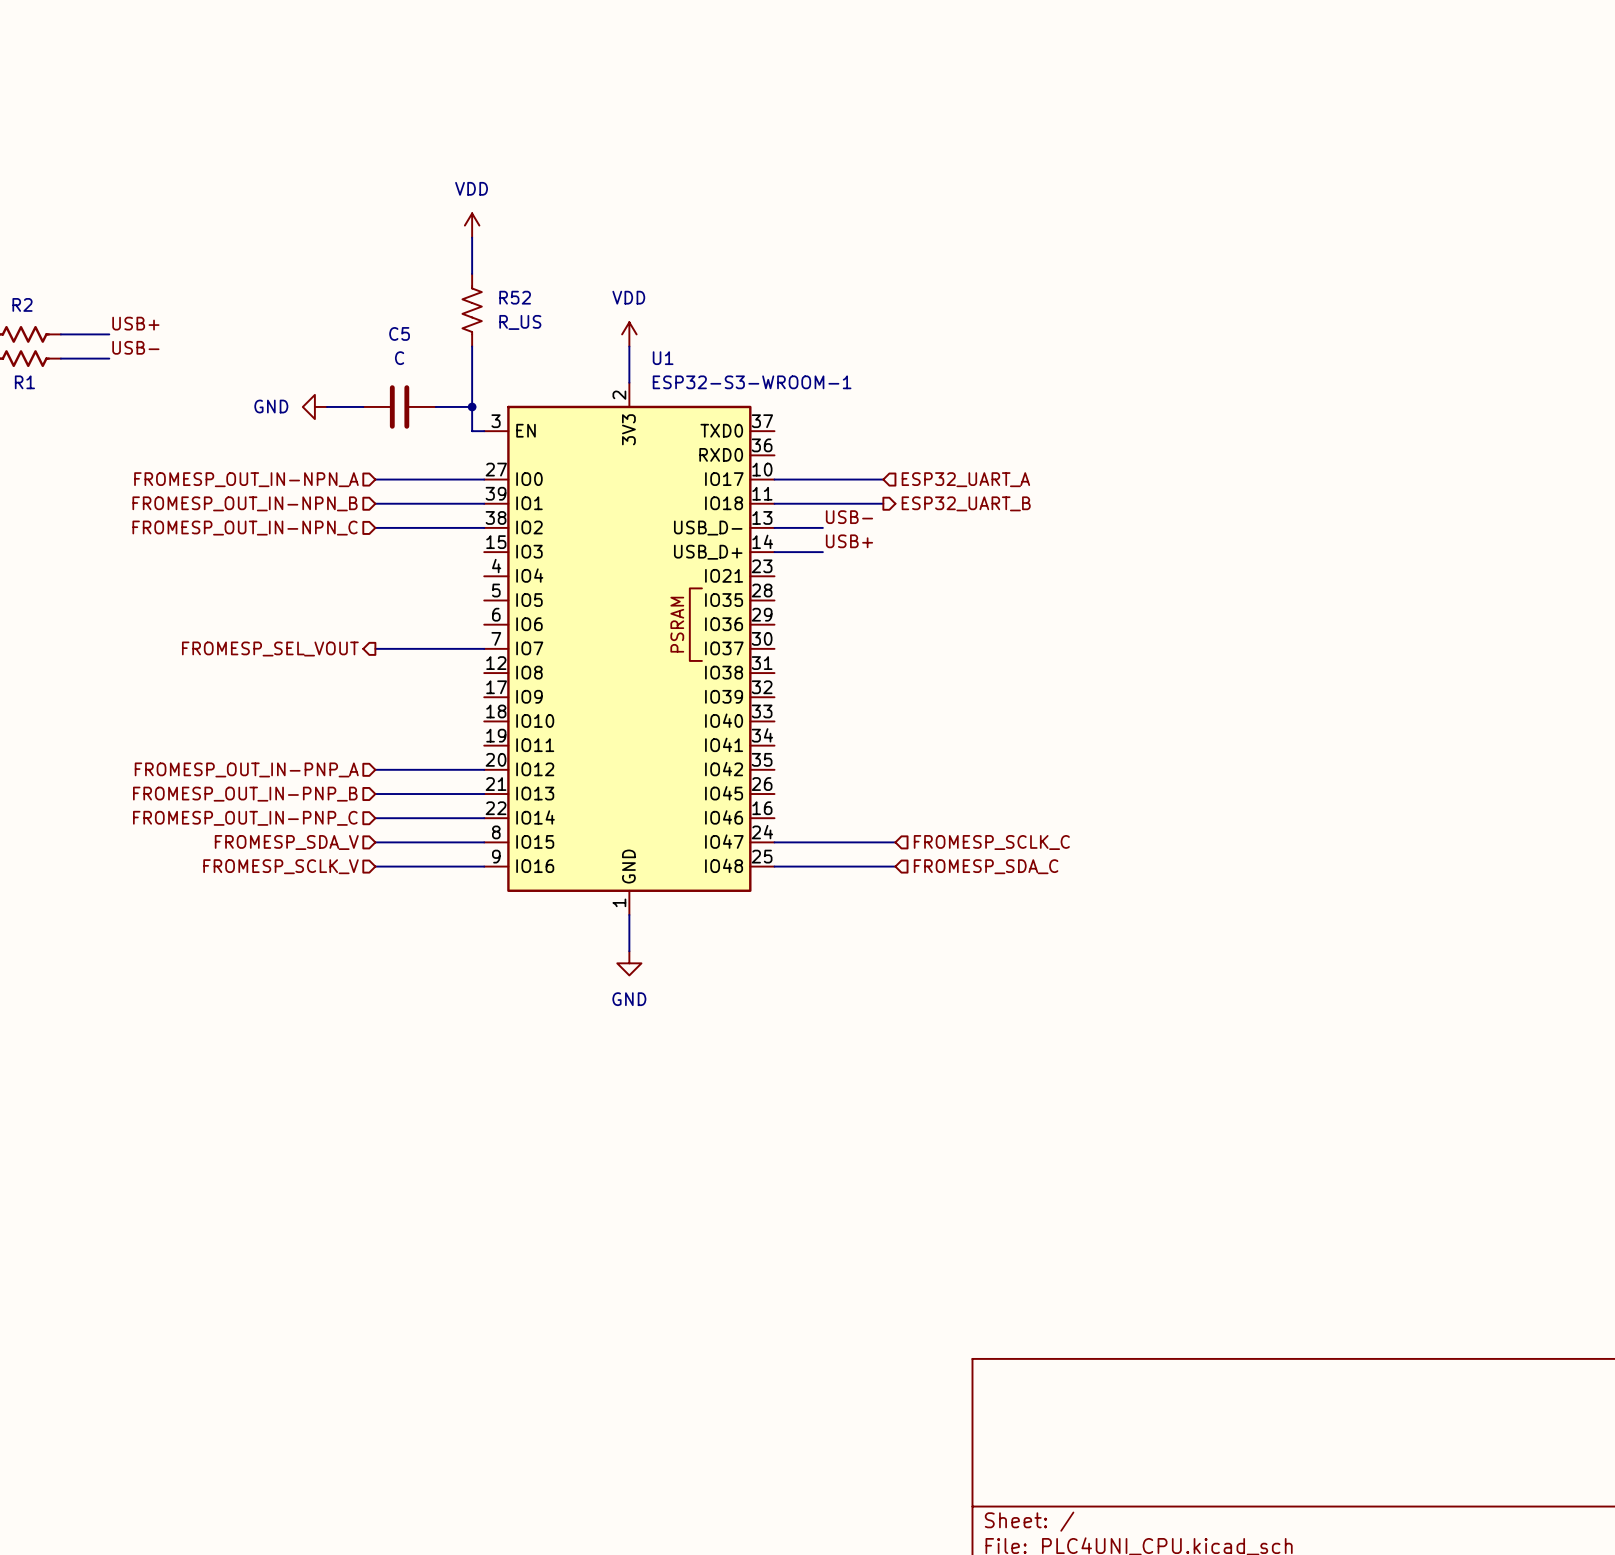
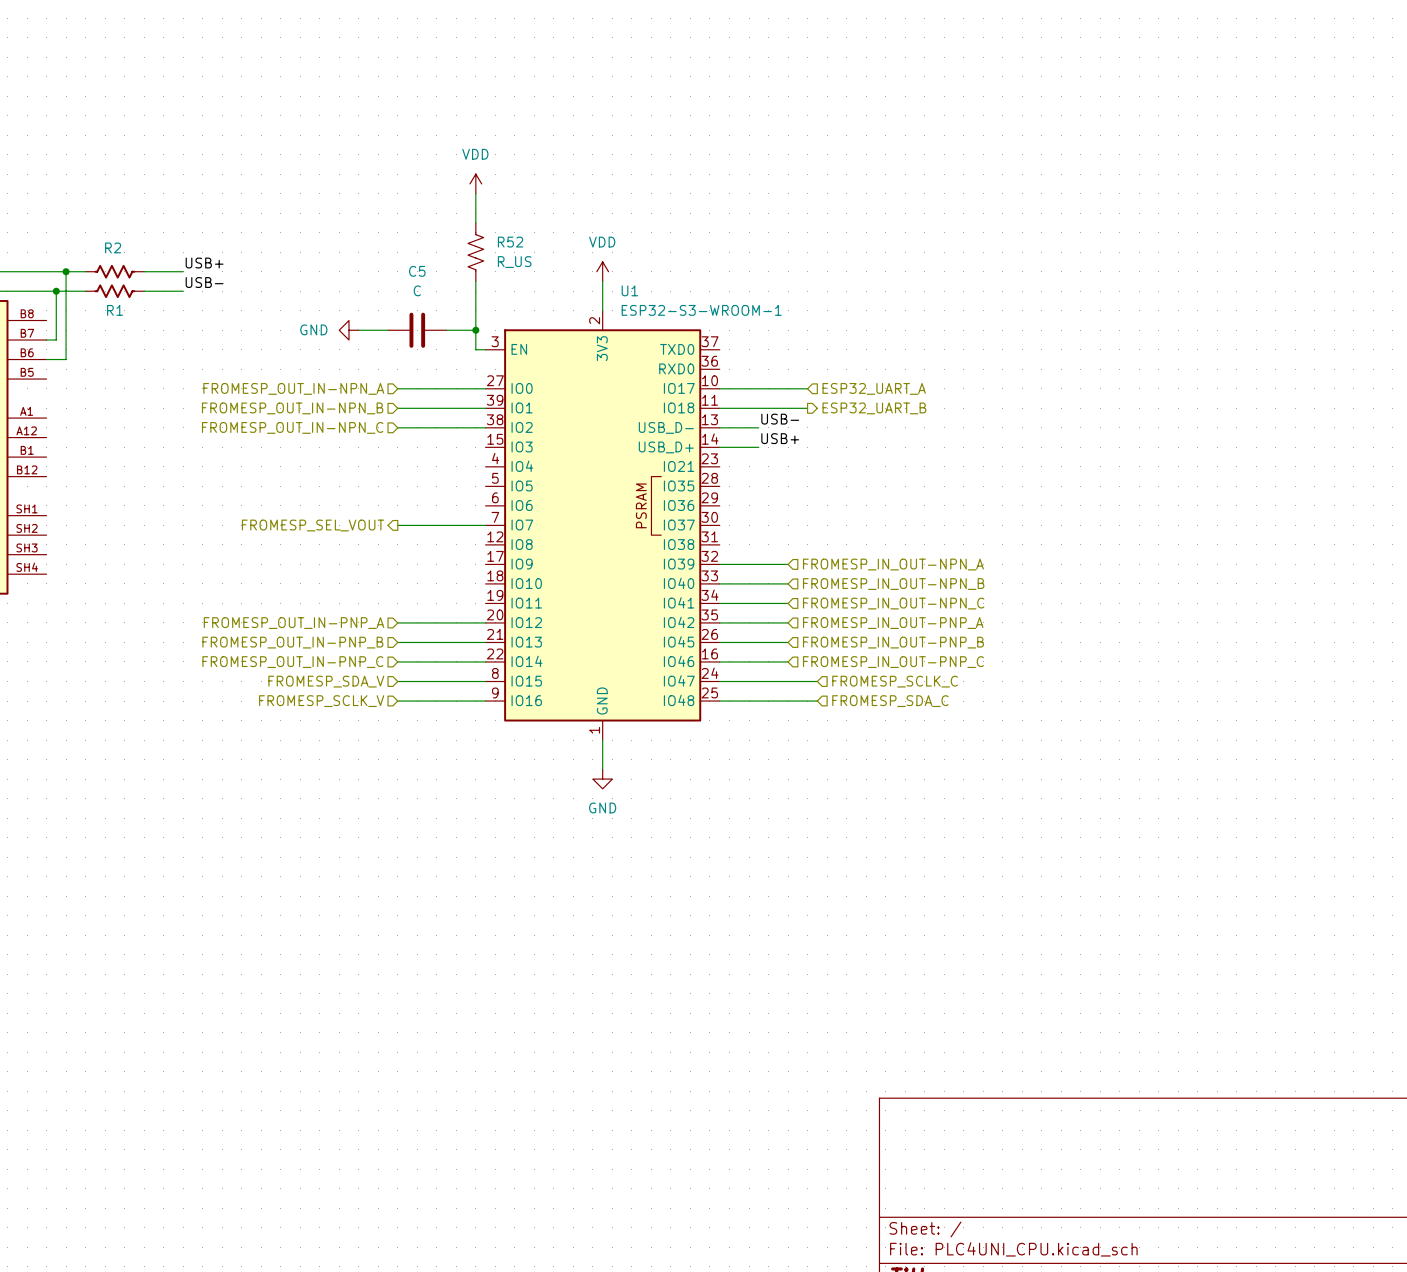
wire: none -> (719, 564) (788, 564)
hierarchical label: none -> FROMESP_IN_OUT-NPN_A (893, 564)
wire: none -> (719, 583) (788, 583)
hierarchical label: none -> FROMESP_IN_OUT-NPN_B (893, 584)
wire: none -> (719, 603) (788, 603)
hierarchical label: none -> FROMESP_IN_OUT-NPN_C (893, 603)
wire: none -> (719, 622) (788, 622)
hierarchical label: none -> FROMESP_IN_OUT-PNP_A (893, 623)
wire: none -> (719, 642) (788, 642)
hierarchical label: none -> FROMESP_IN_OUT-PNP_B (893, 642)
wire: none -> (719, 661) (788, 661)
hierarchical label: none -> FROMESP_IN_OUT-PNP_C (893, 662)

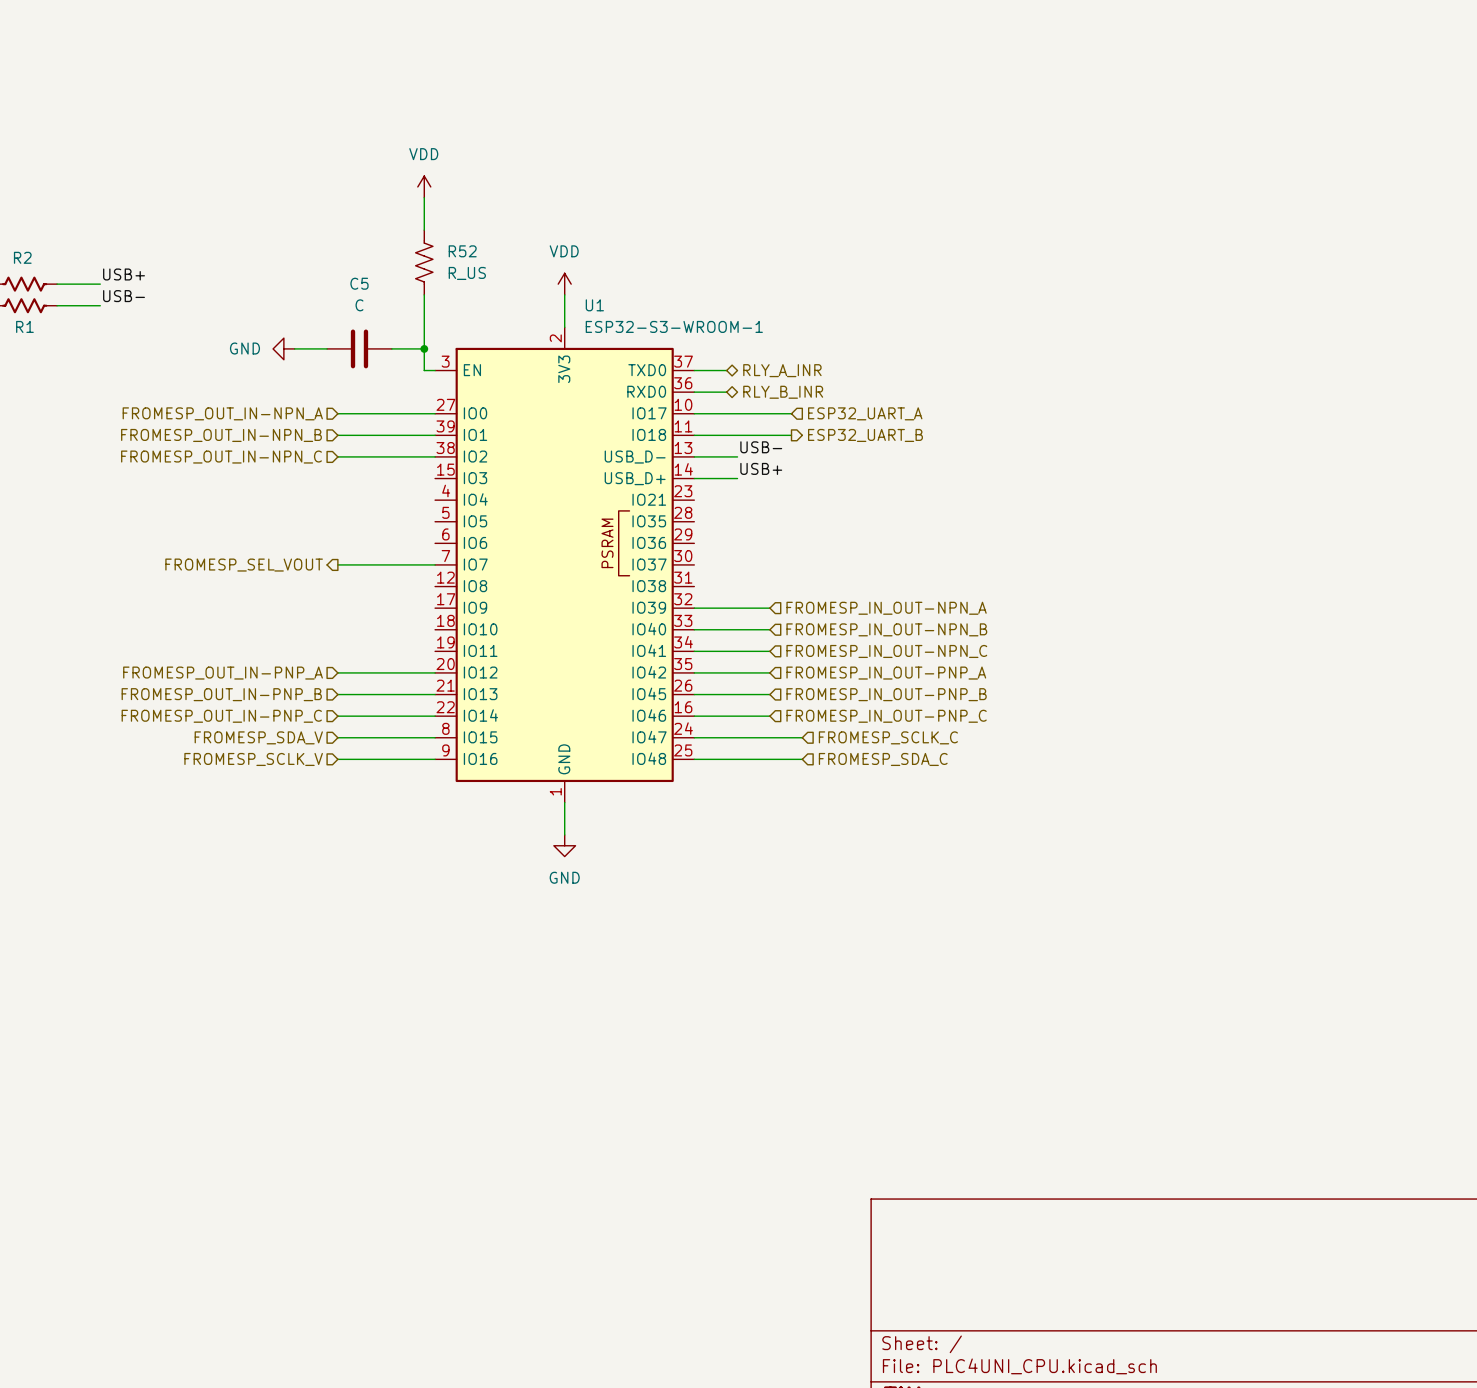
wire: none -> (694, 370) (726, 370)
hierarchical label: none -> RLY_A_INR (782, 370)
wire: none -> (694, 392) (726, 392)
hierarchical label: none -> RLY_B_INR (783, 392)

